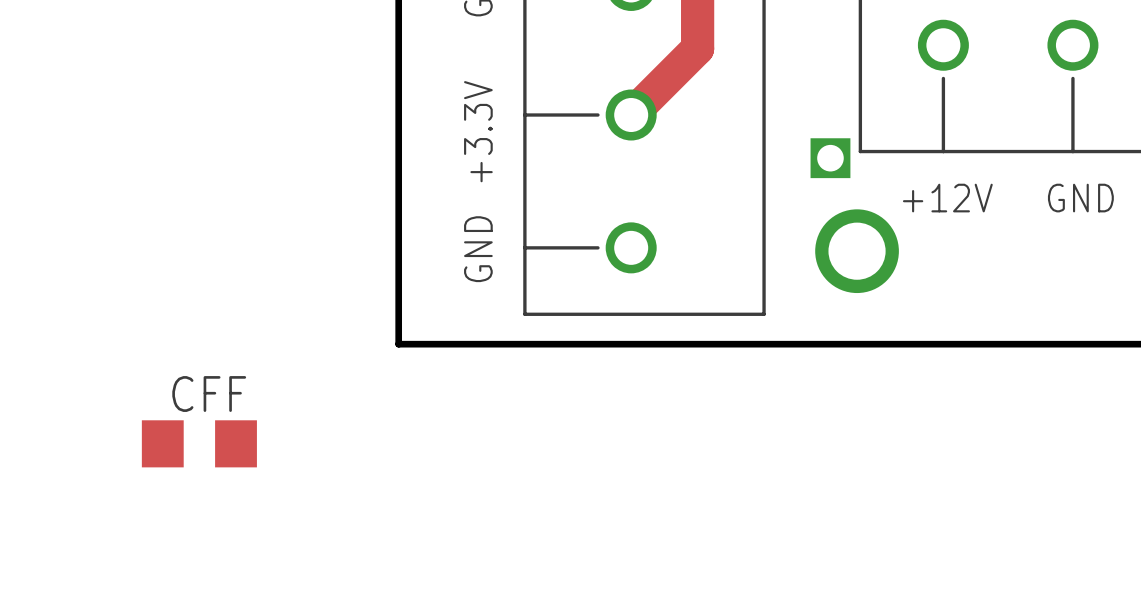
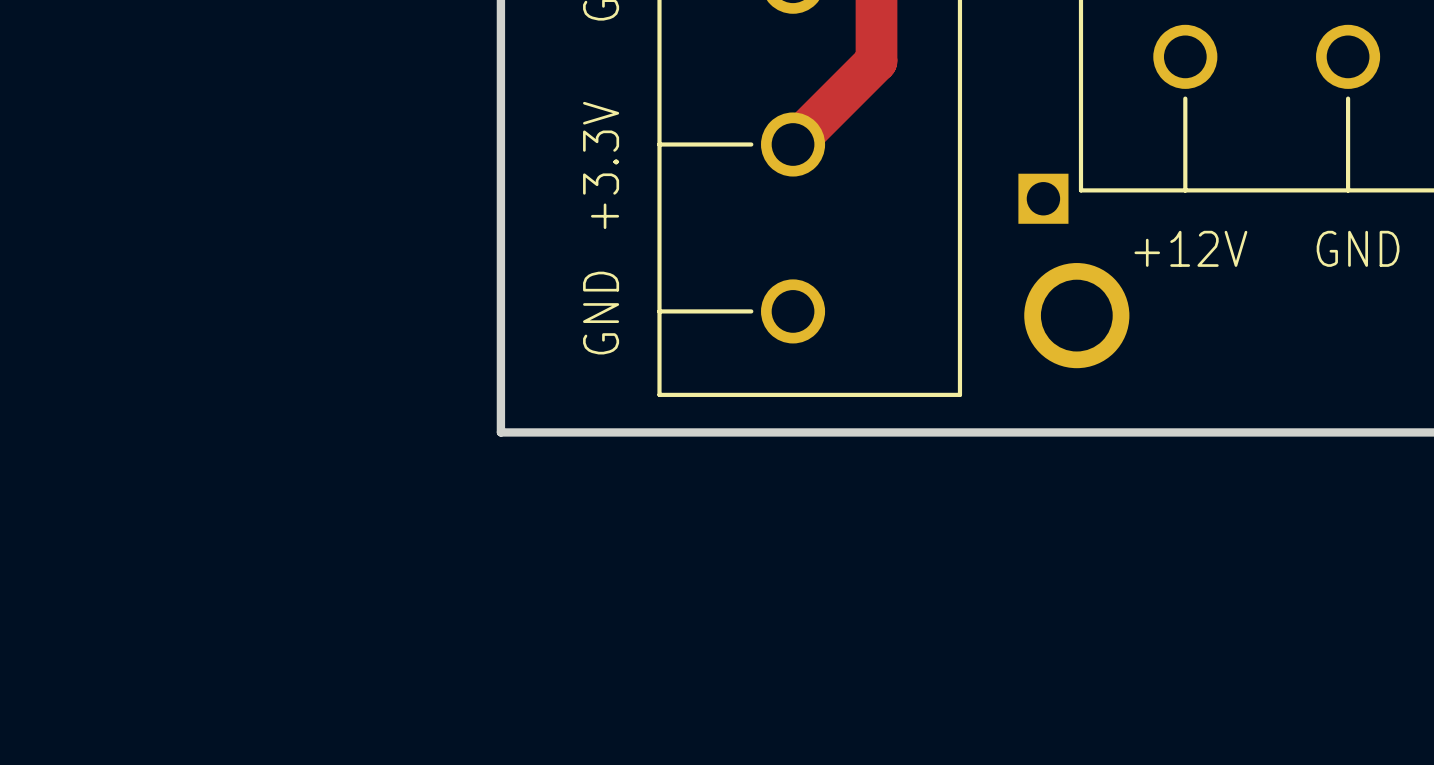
CFF: (199, 443) -> none

